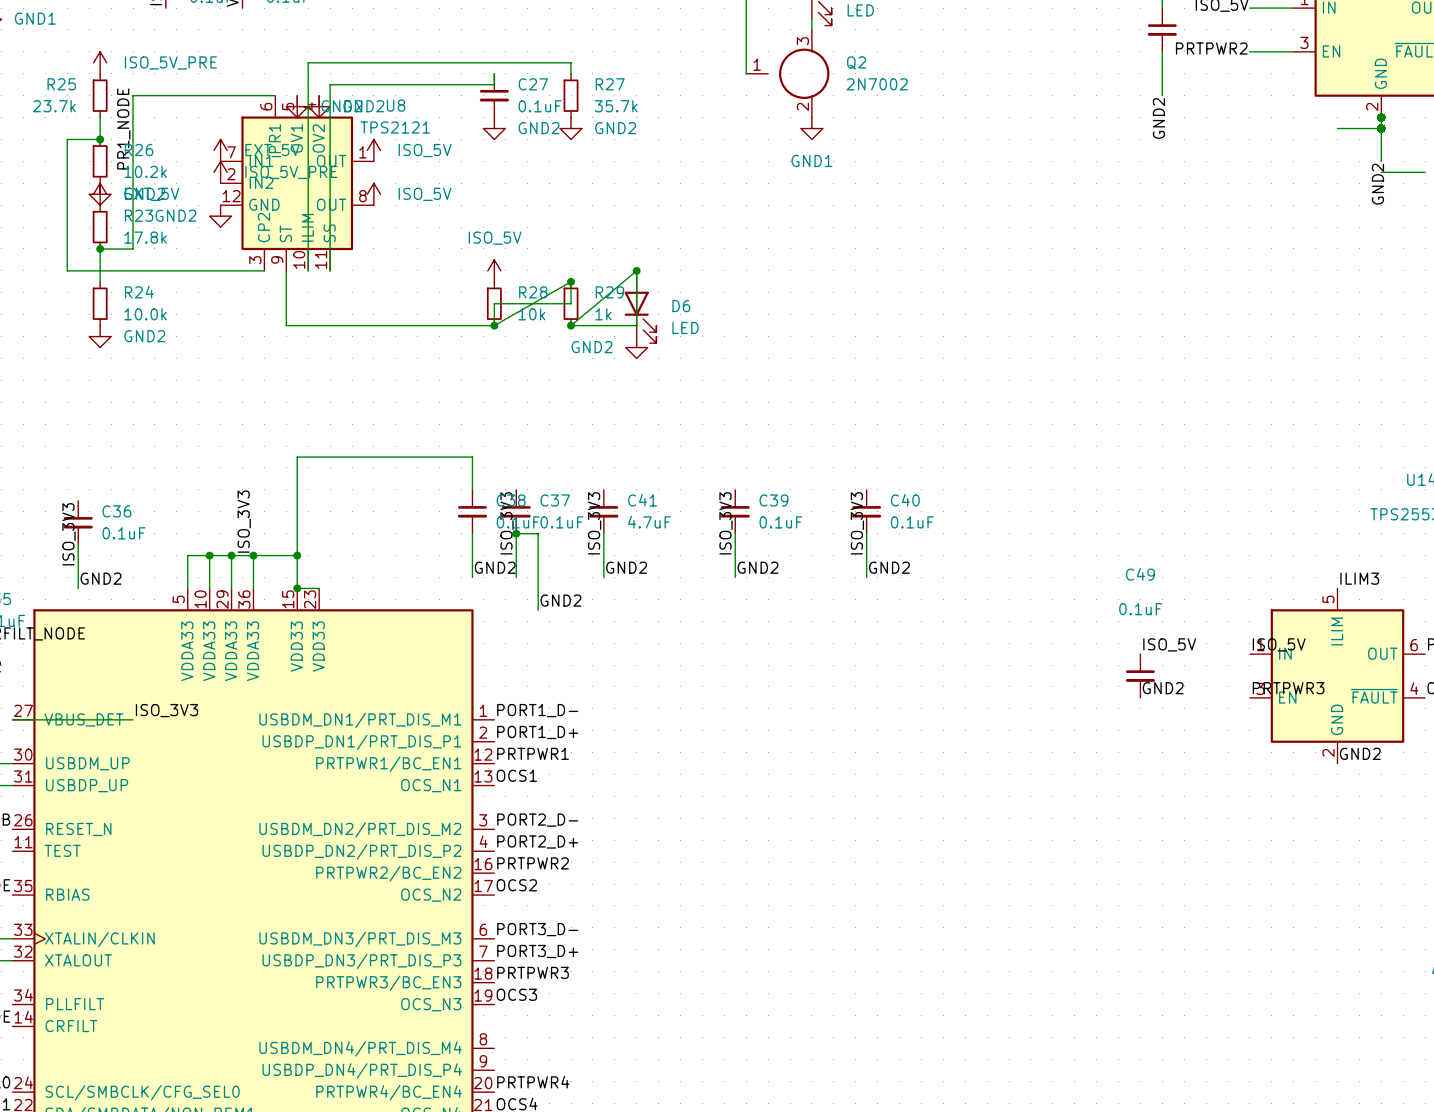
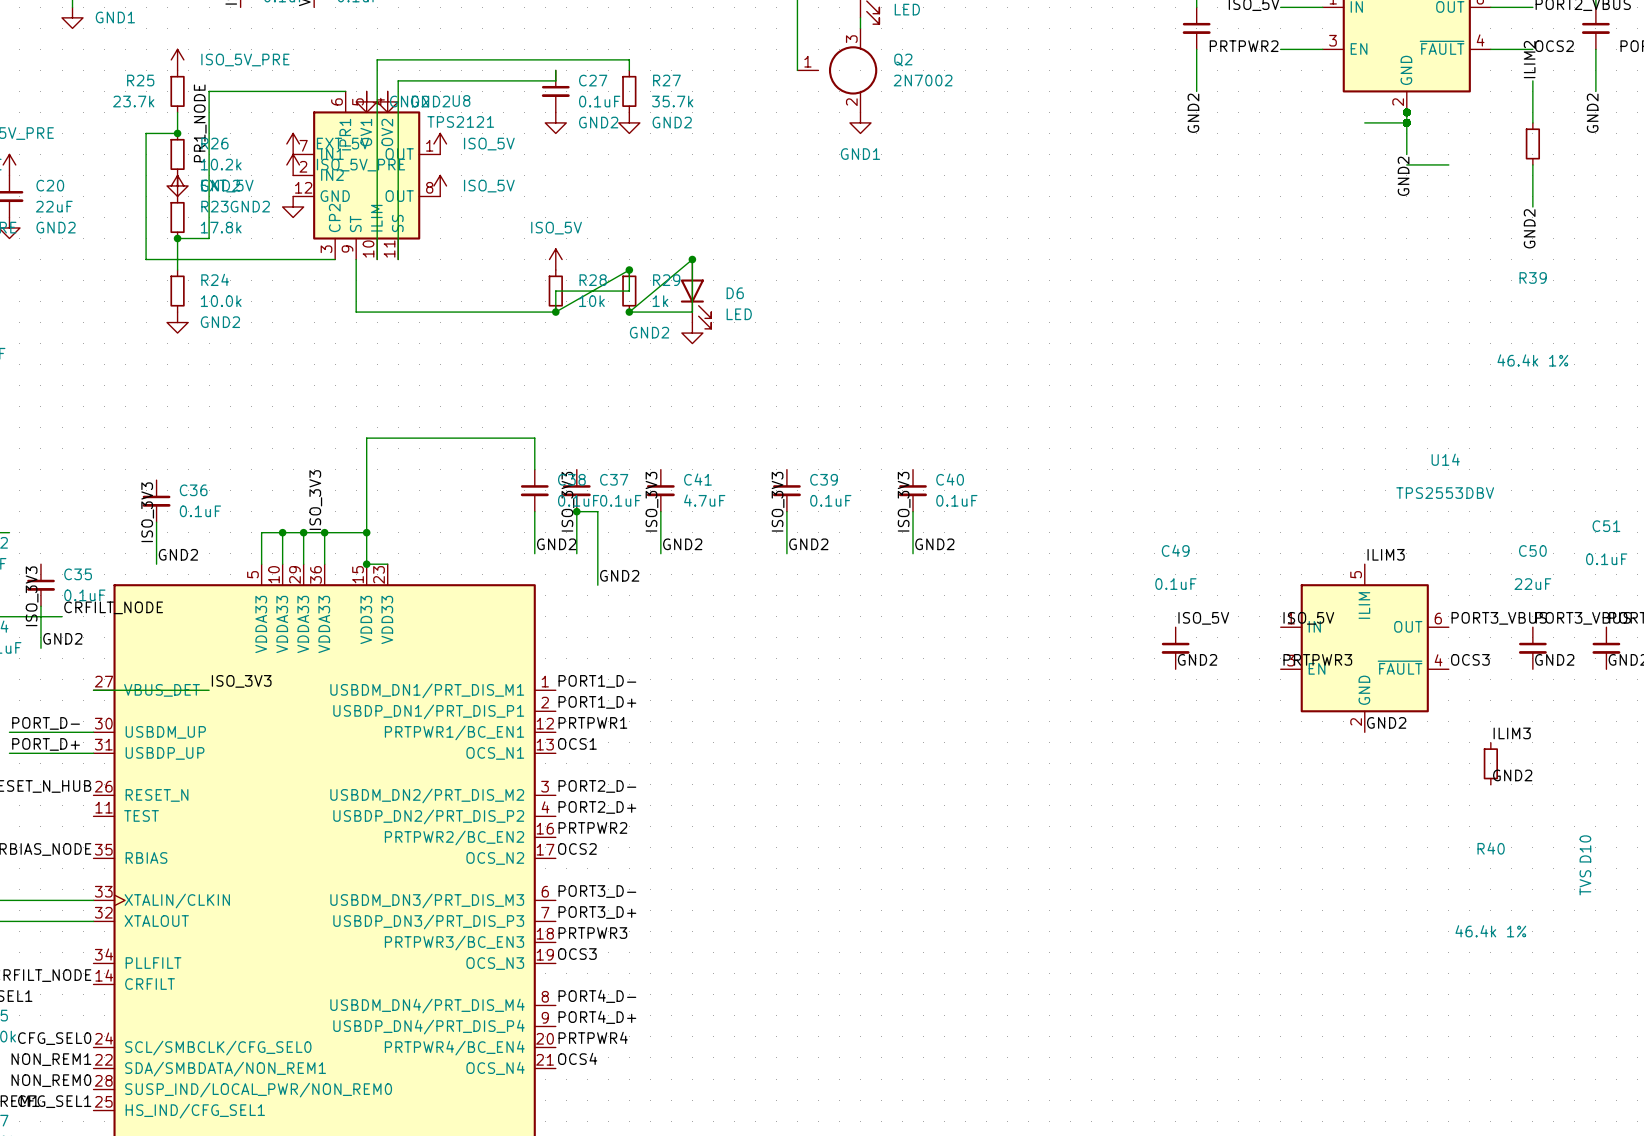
label: none -> PORT4_D- (597, 996)
label: none -> PORT4_D+ (597, 1017)

